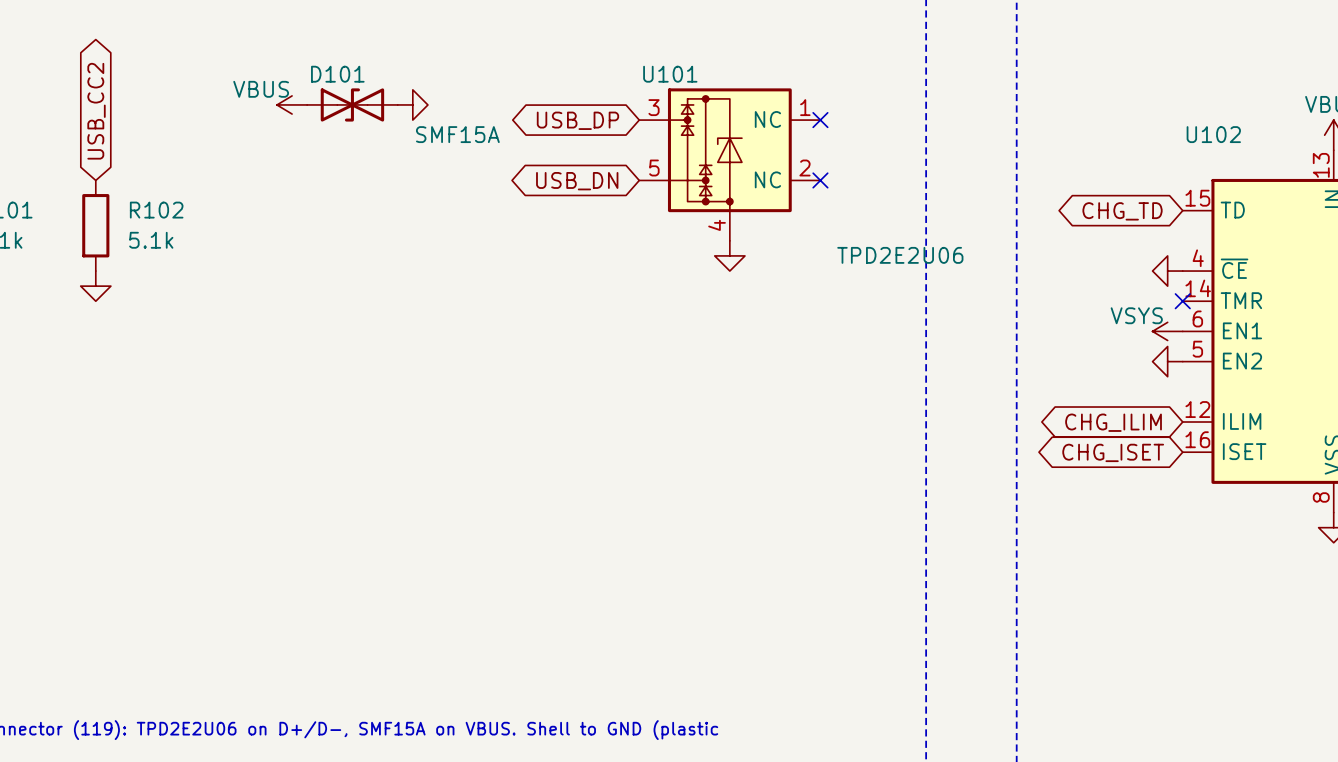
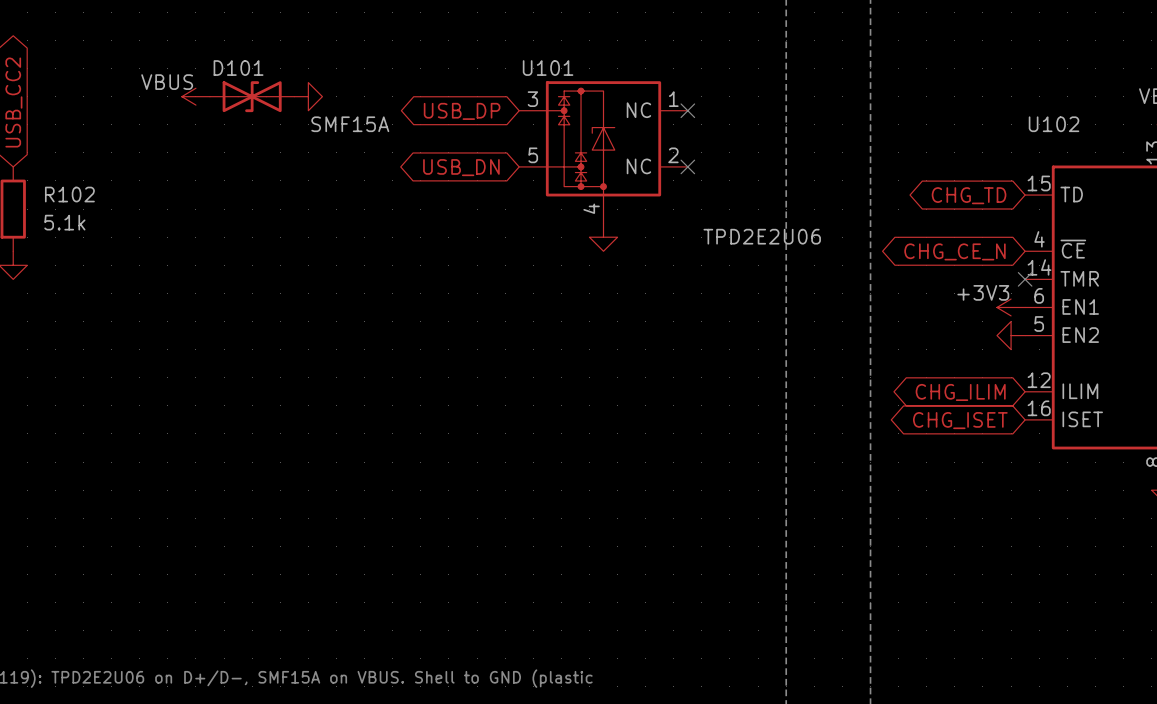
global label: none -> CHG_CE_N (955, 251)
power symbol: (1167, 271) -> none
power symbol: VSYS (1167, 331) -> +3V3 (1011, 307)

